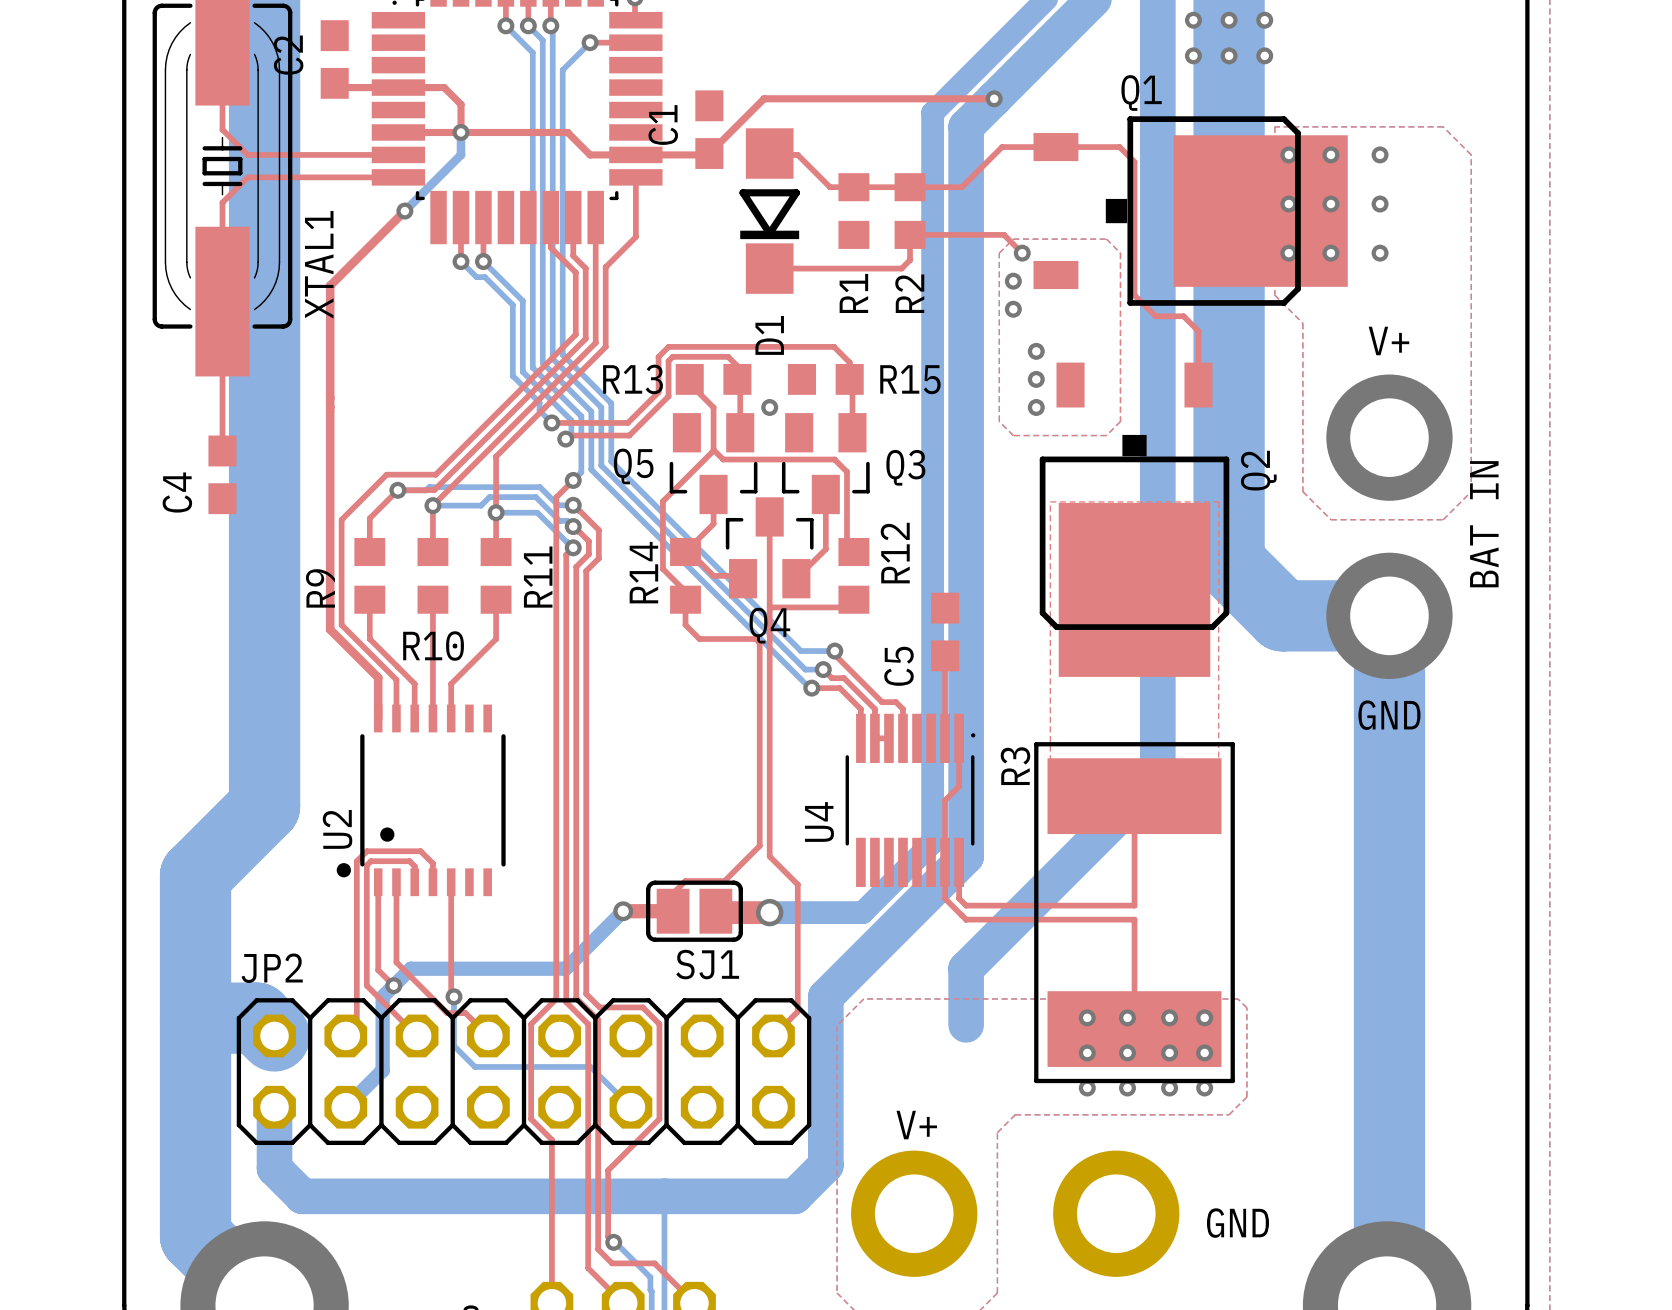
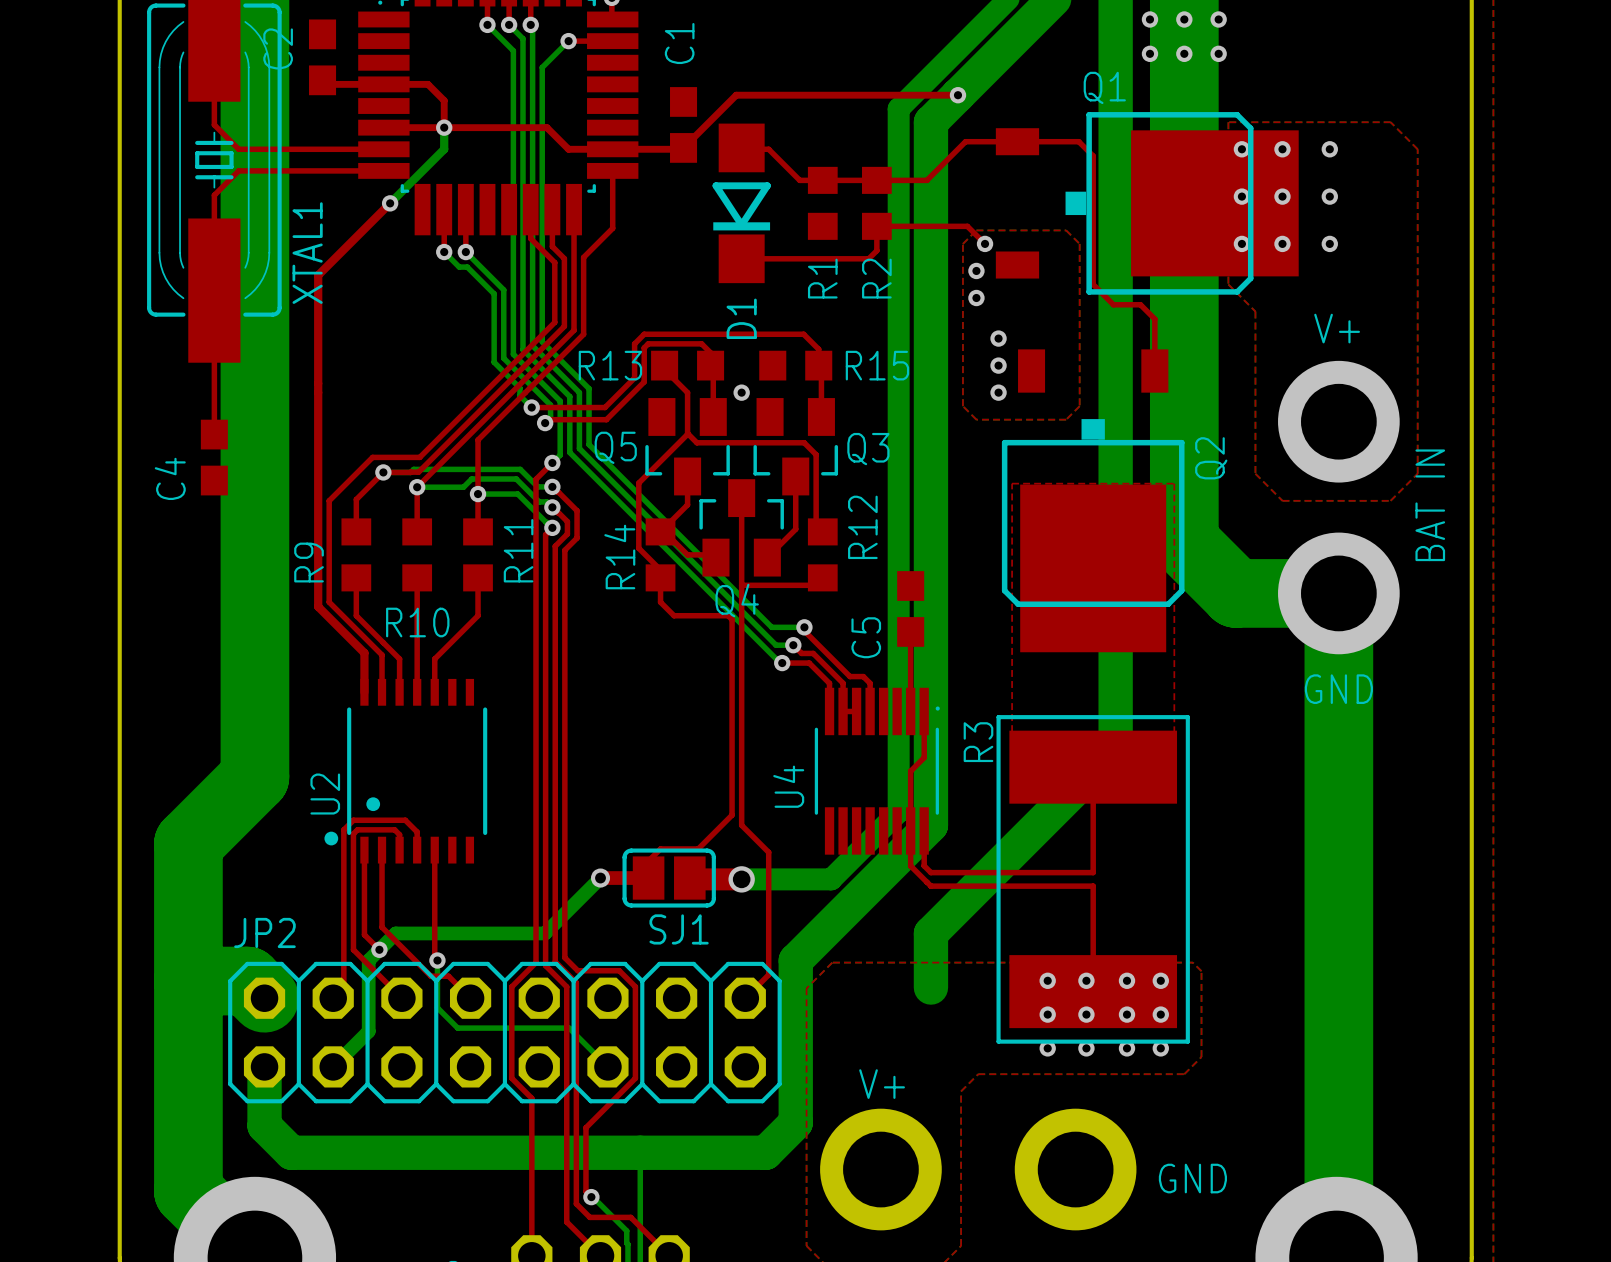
C1 name position: C1 (663, 125) -> C1 (679, 43)

